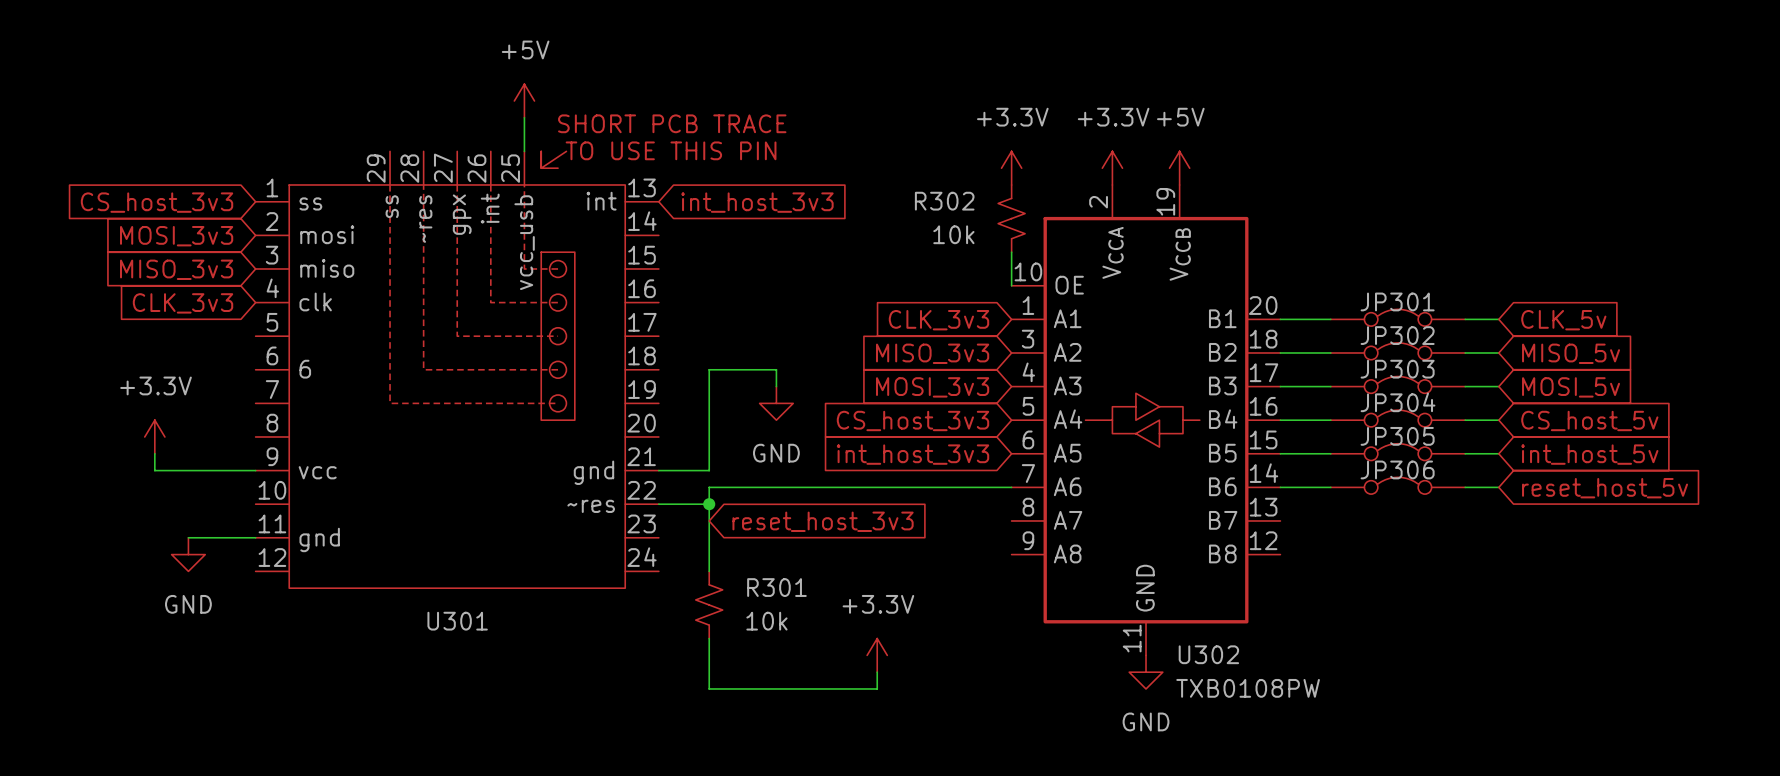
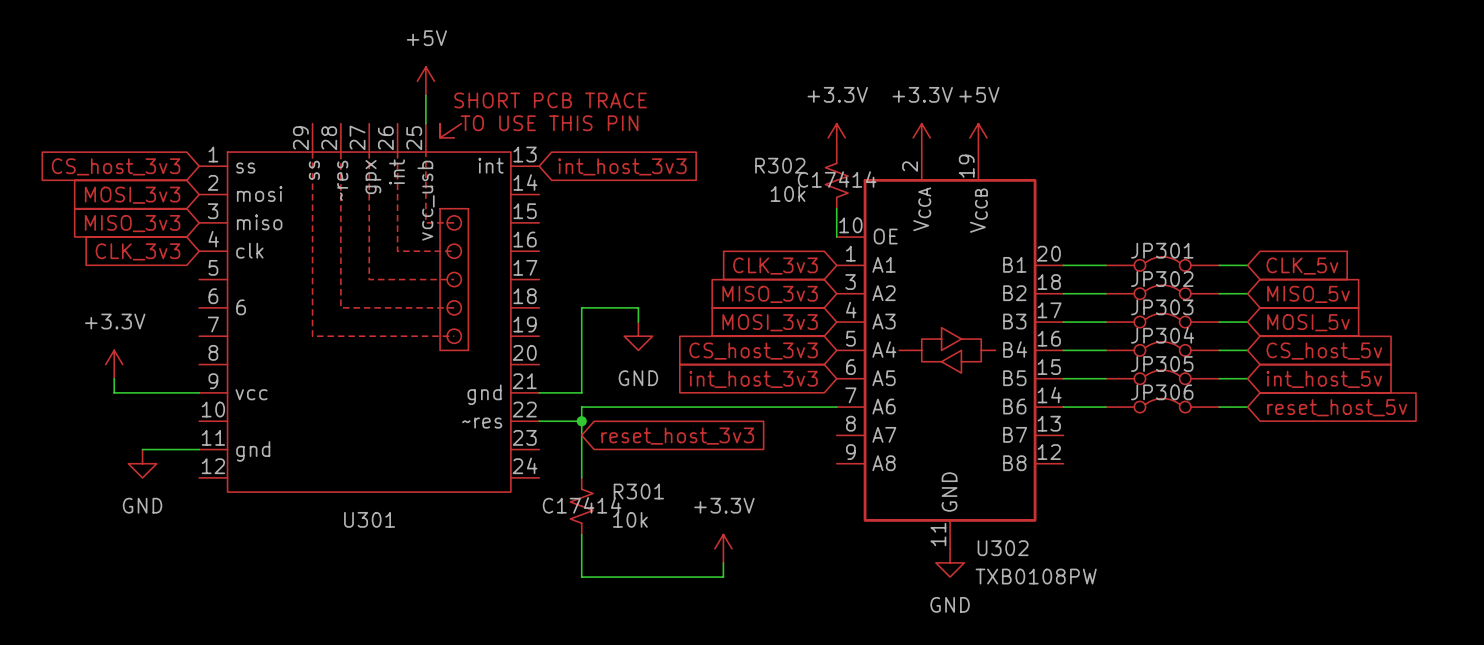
R302 text: none -> C17414 (837, 179)
R301 text: none -> C17414 (582, 505)

